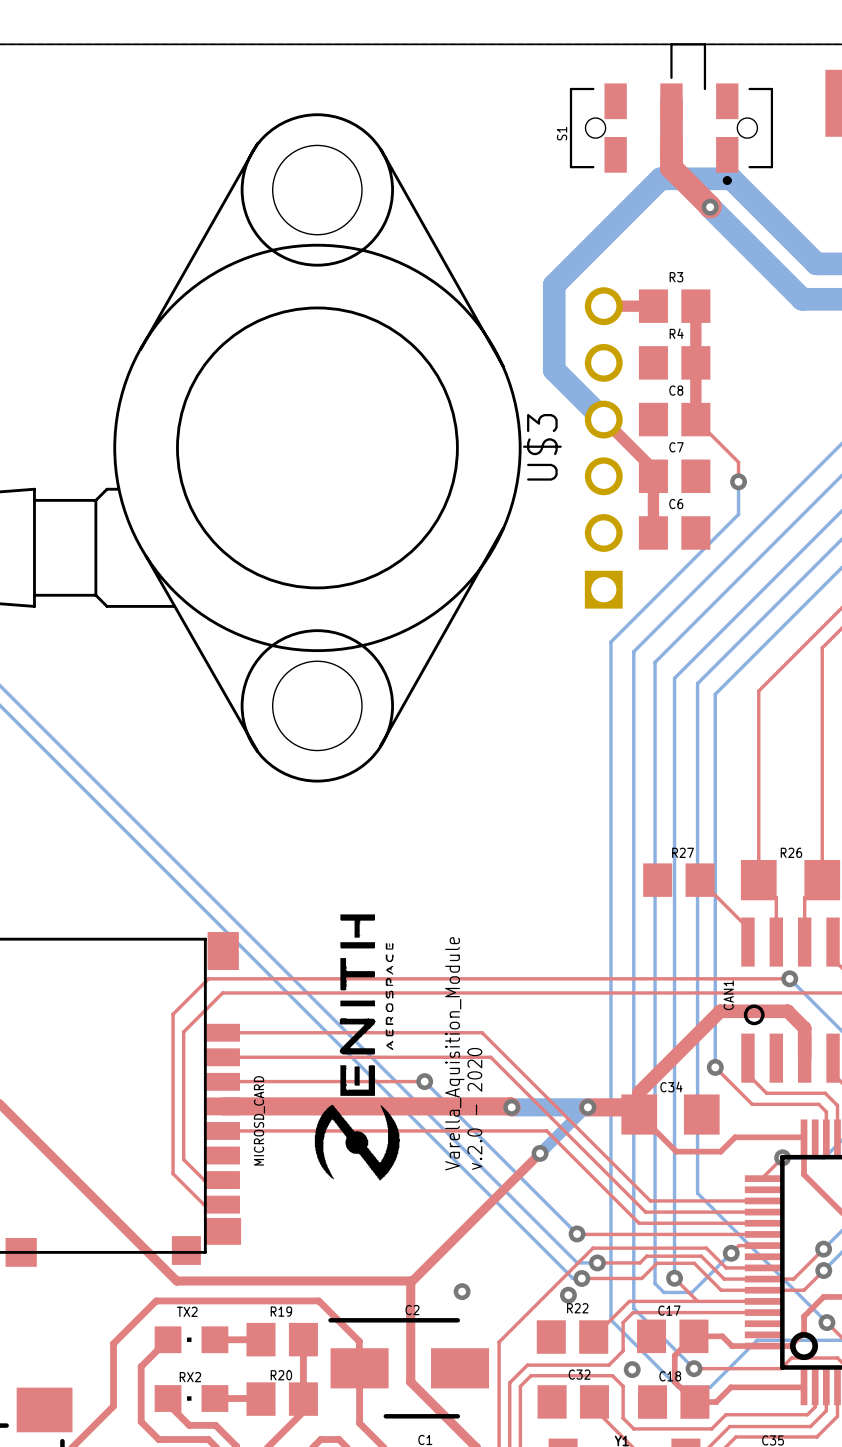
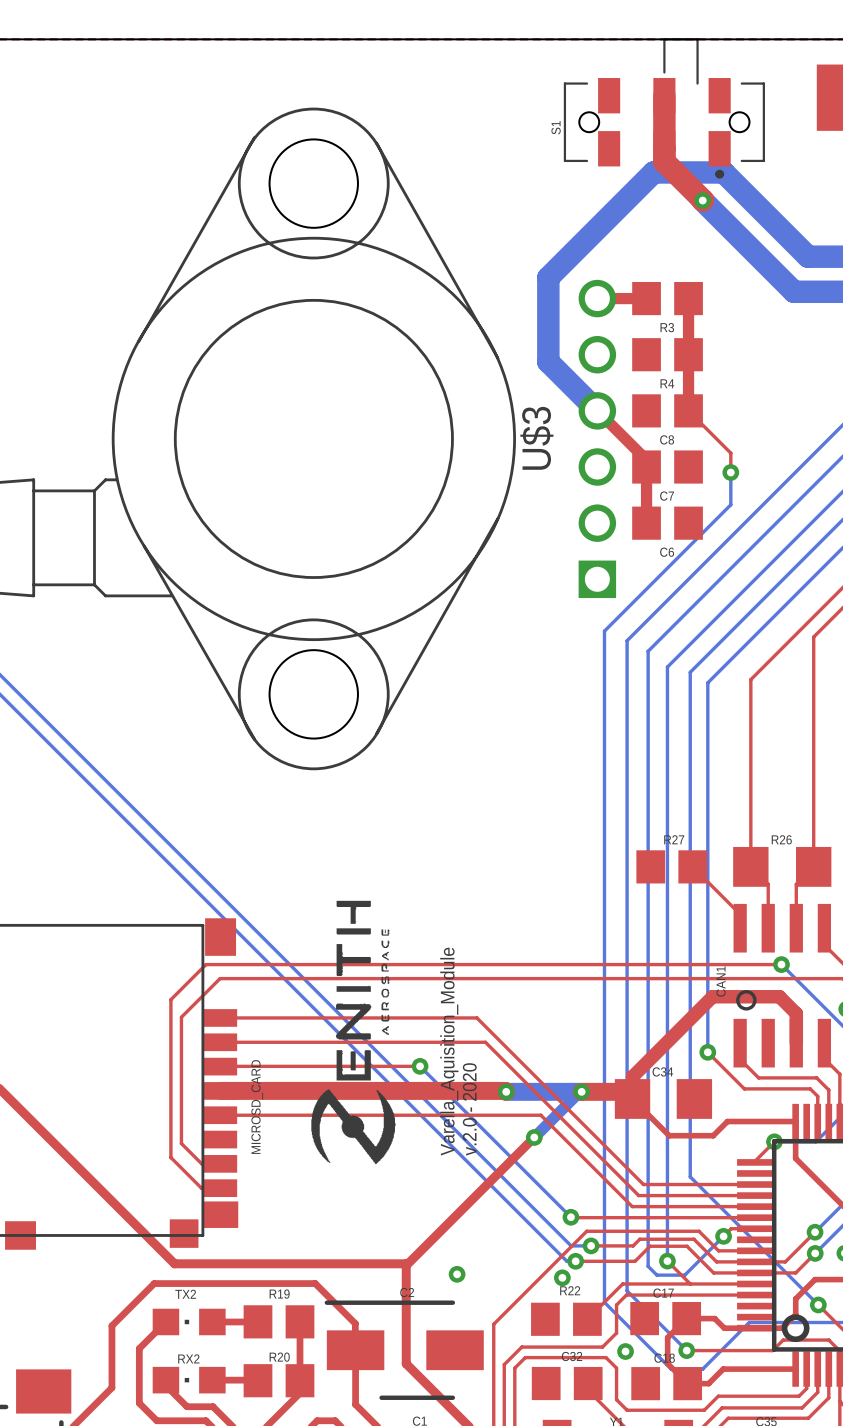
R3 name position: R3 (676, 277) -> R3 (667, 327)
R4 name position: R4 (676, 333) -> R4 (667, 383)
C8 name position: C8 (676, 390) -> C8 (667, 439)
C7 name position: C7 (676, 447) -> C7 (667, 496)
C6 name position: C6 (676, 504) -> C6 (667, 552)

